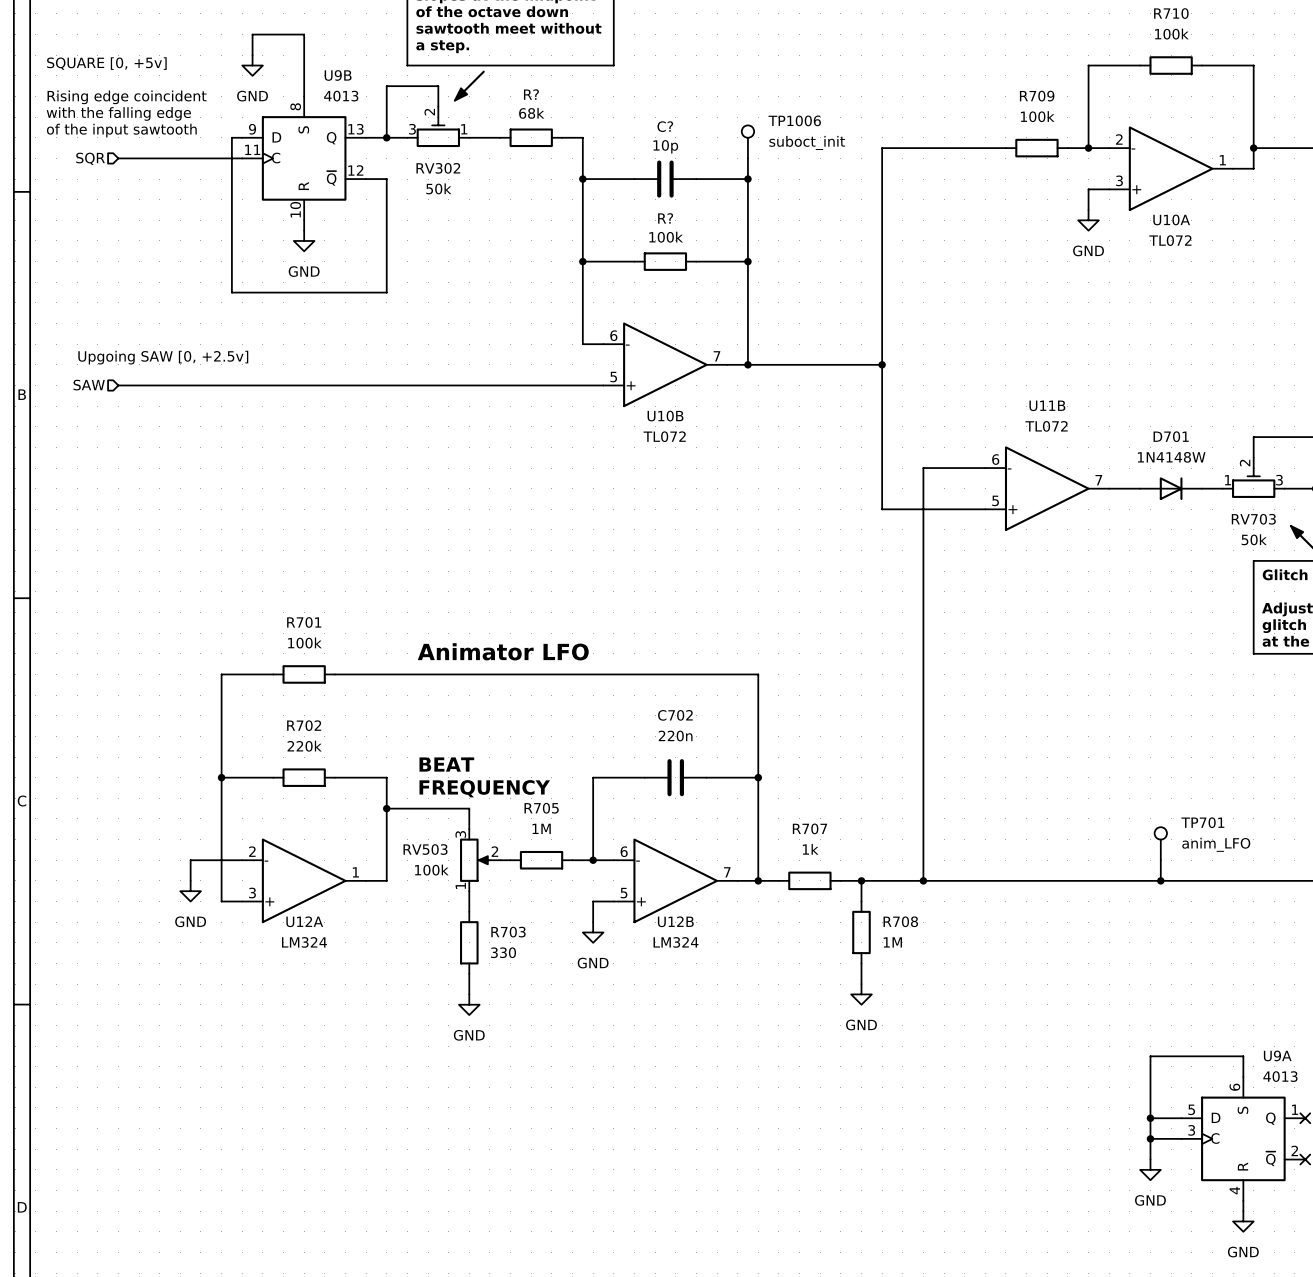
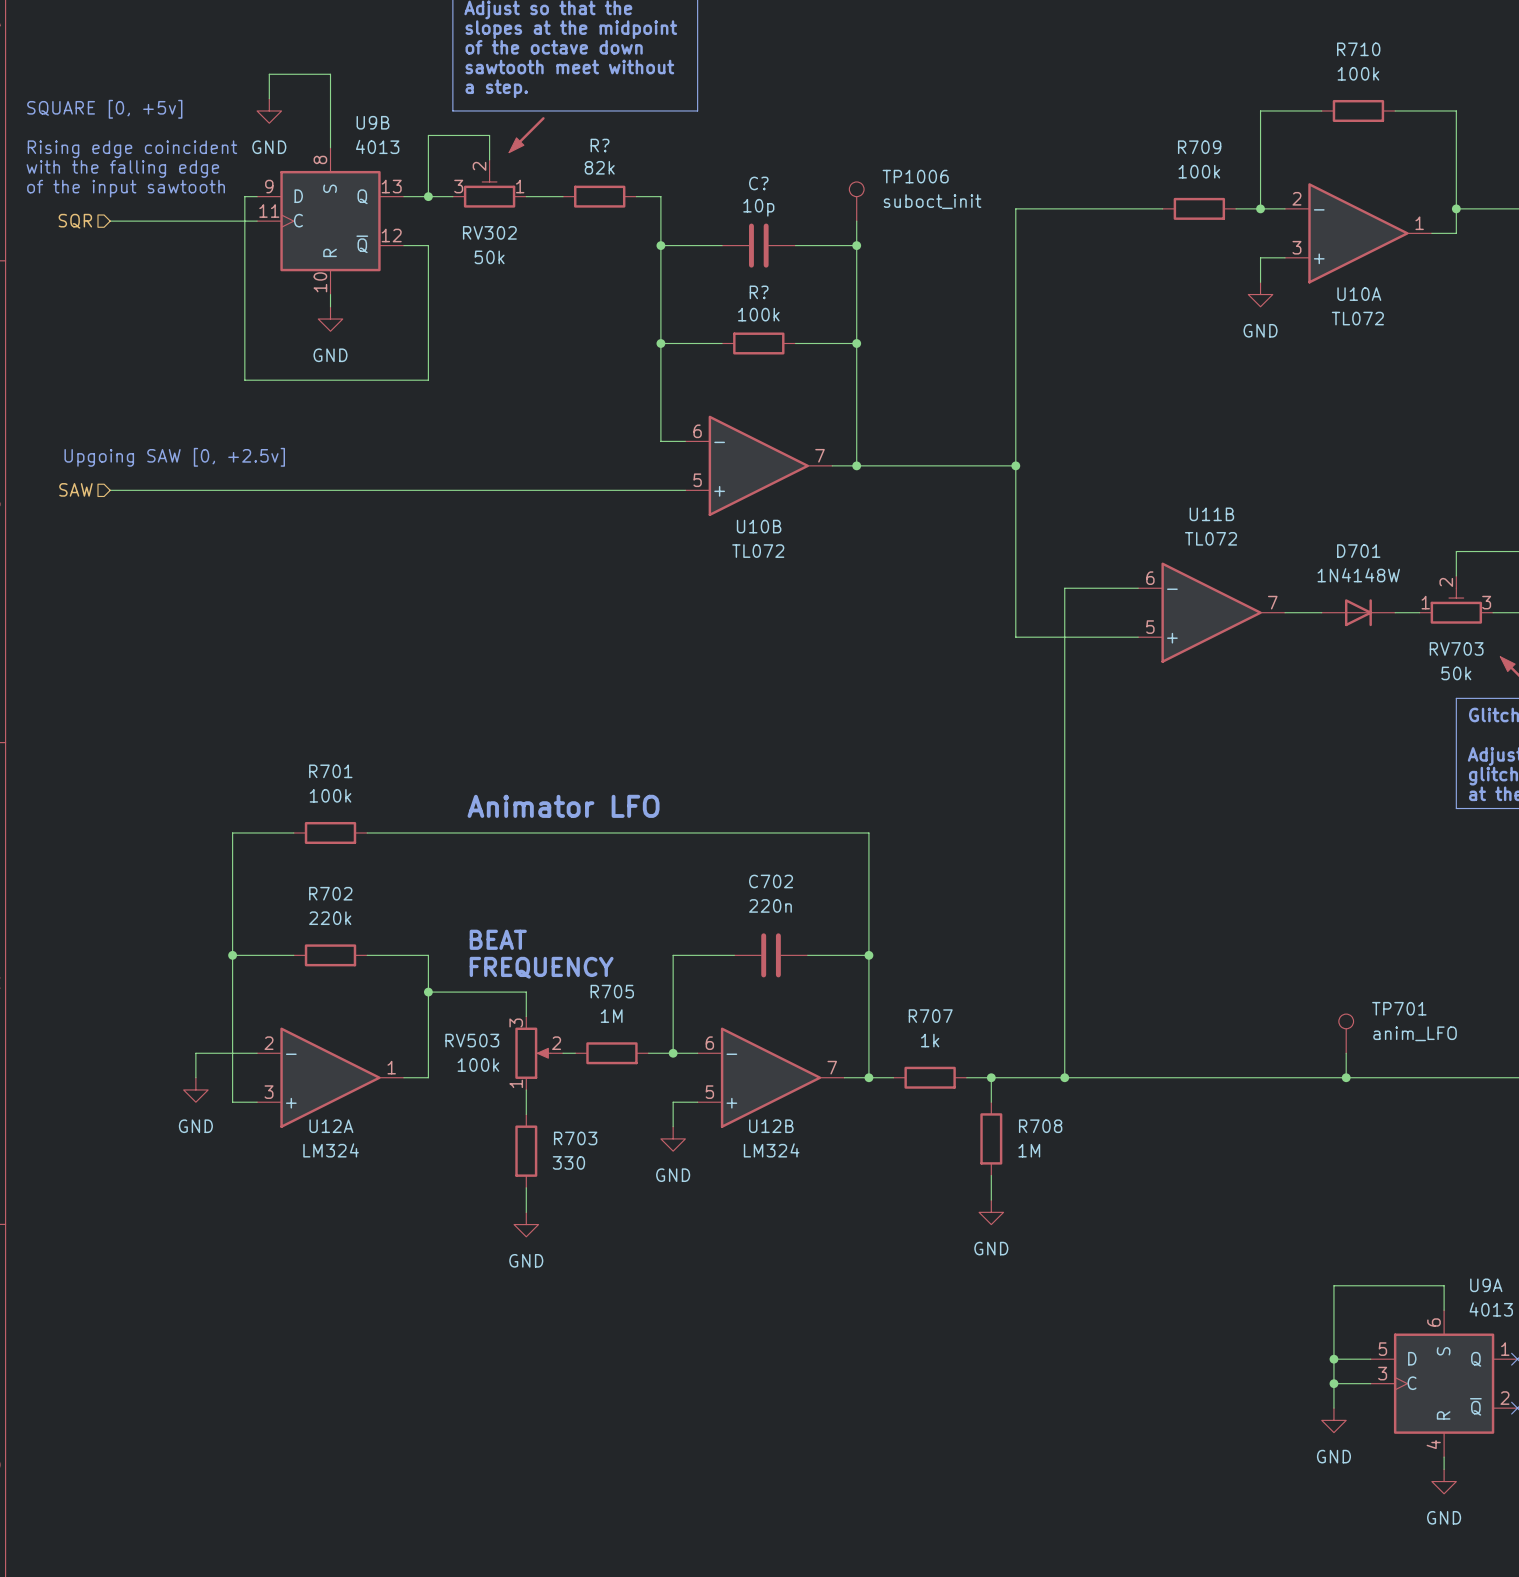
R? value: 68k (531, 113) -> 82k (599, 167)

